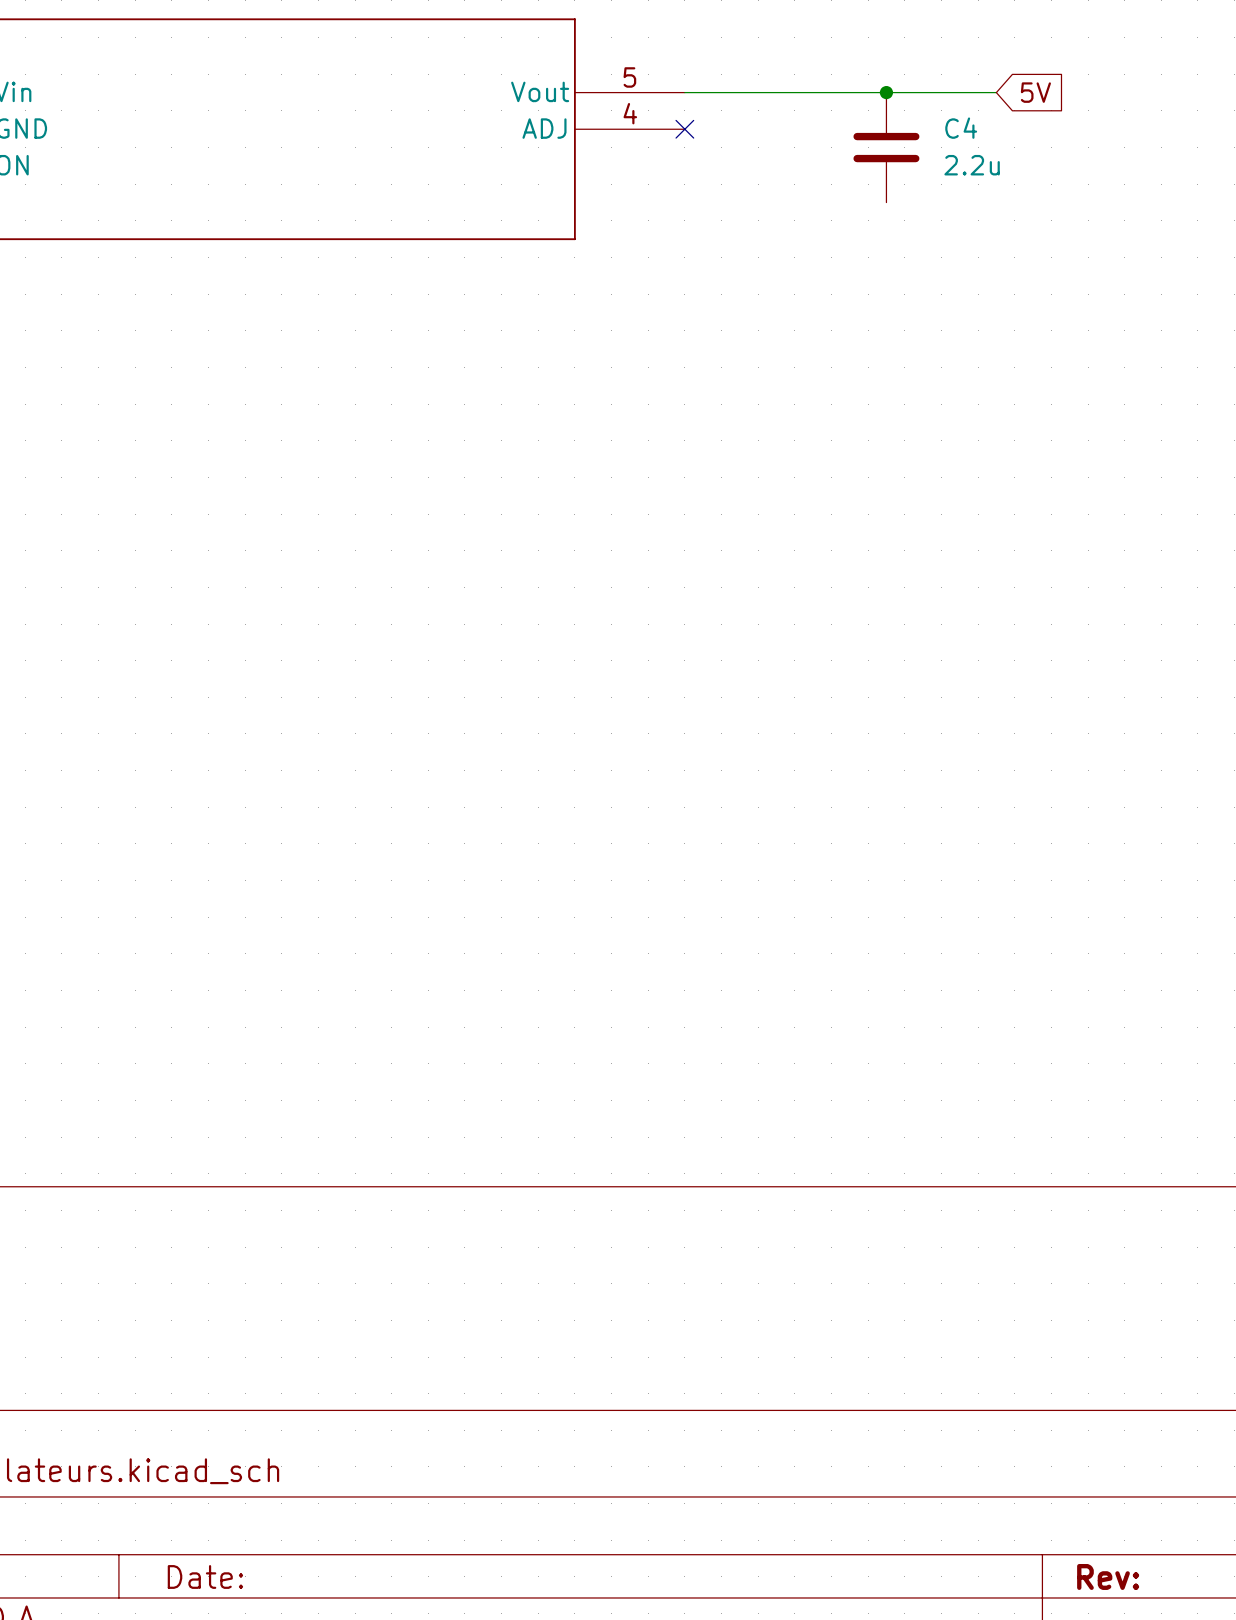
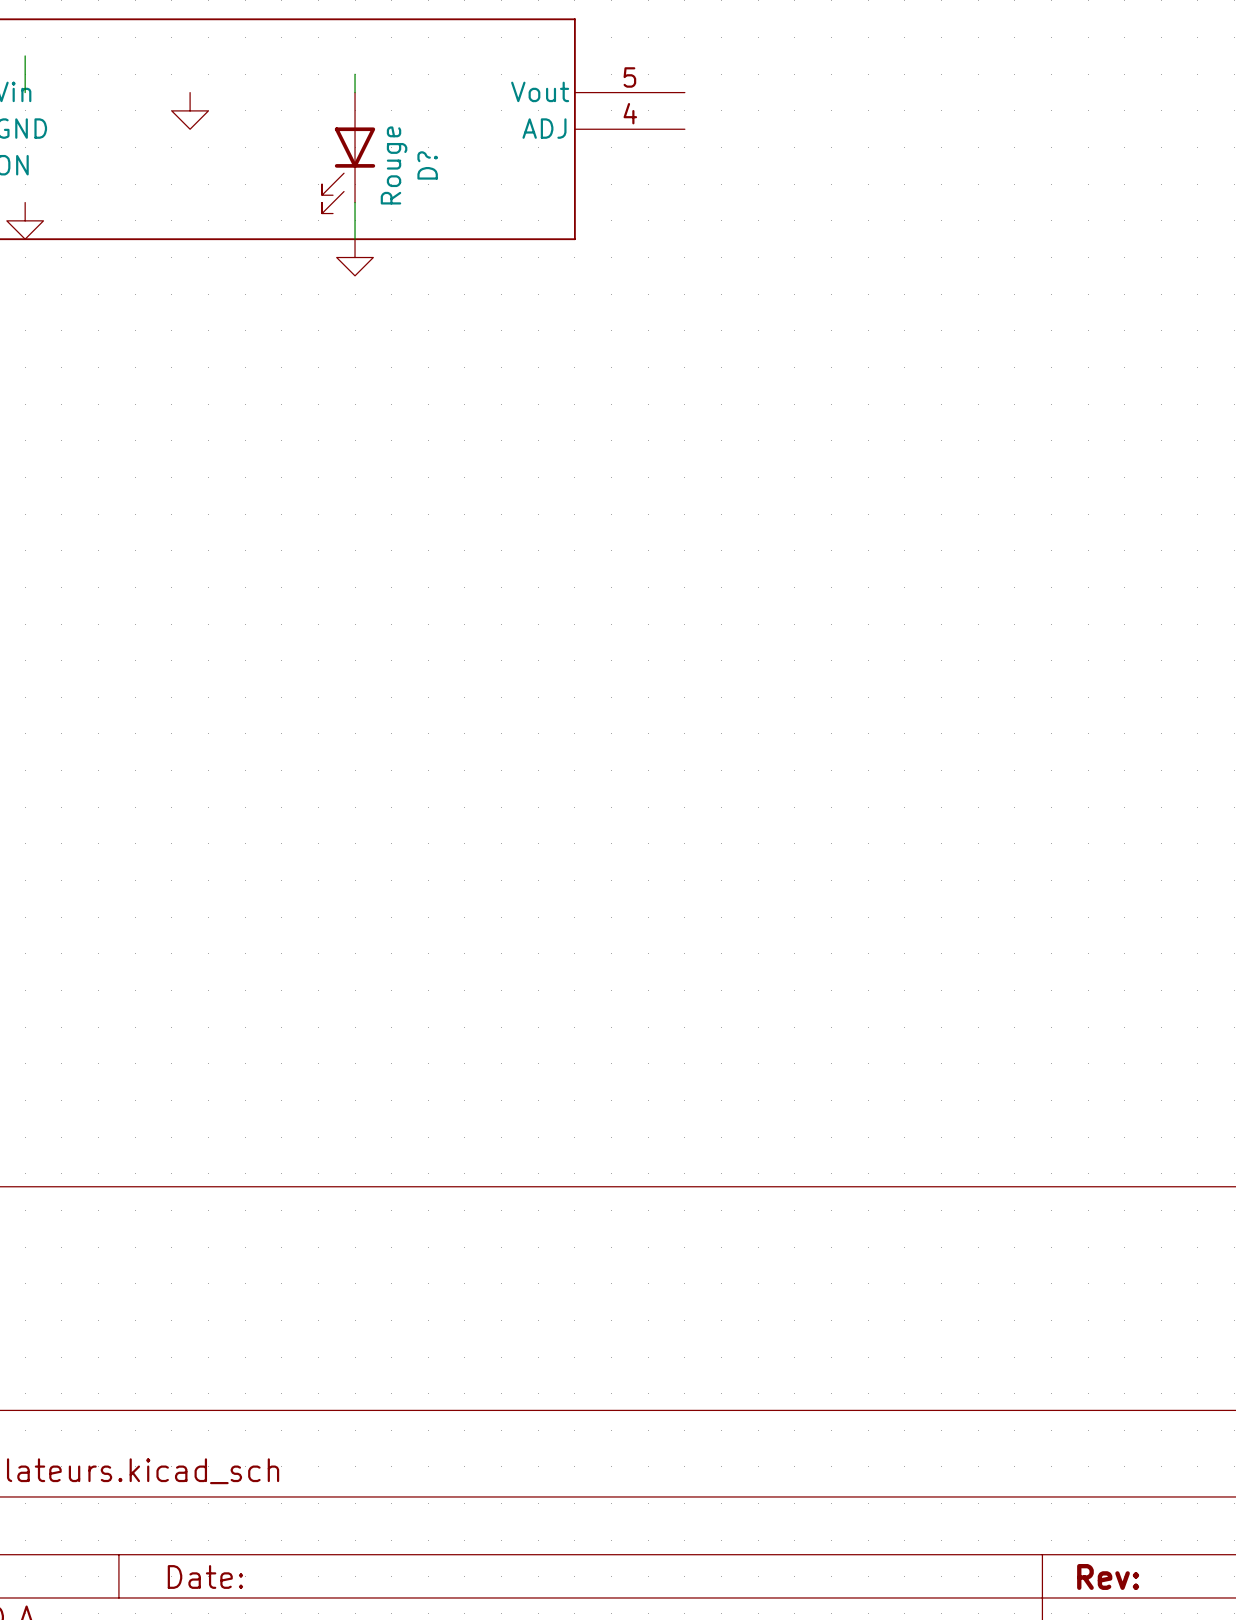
wire: none -> (25, 55) (25, 92)
wire: none -> (355, 74) (355, 92)
wire: (684, 92) (996, 92) -> none
junction: (886, 92) -> none
global label: 5V (1035, 92) -> none
power symbol: none -> (190, 110)
no-connect mark: (684, 129) -> none
C4: 2.2u (886, 147) -> none
D?: none -> Rouge (348, 153)
wire: none -> (355, 202) (355, 239)
power symbol: none -> (25, 220)
power symbol: none -> (355, 257)

